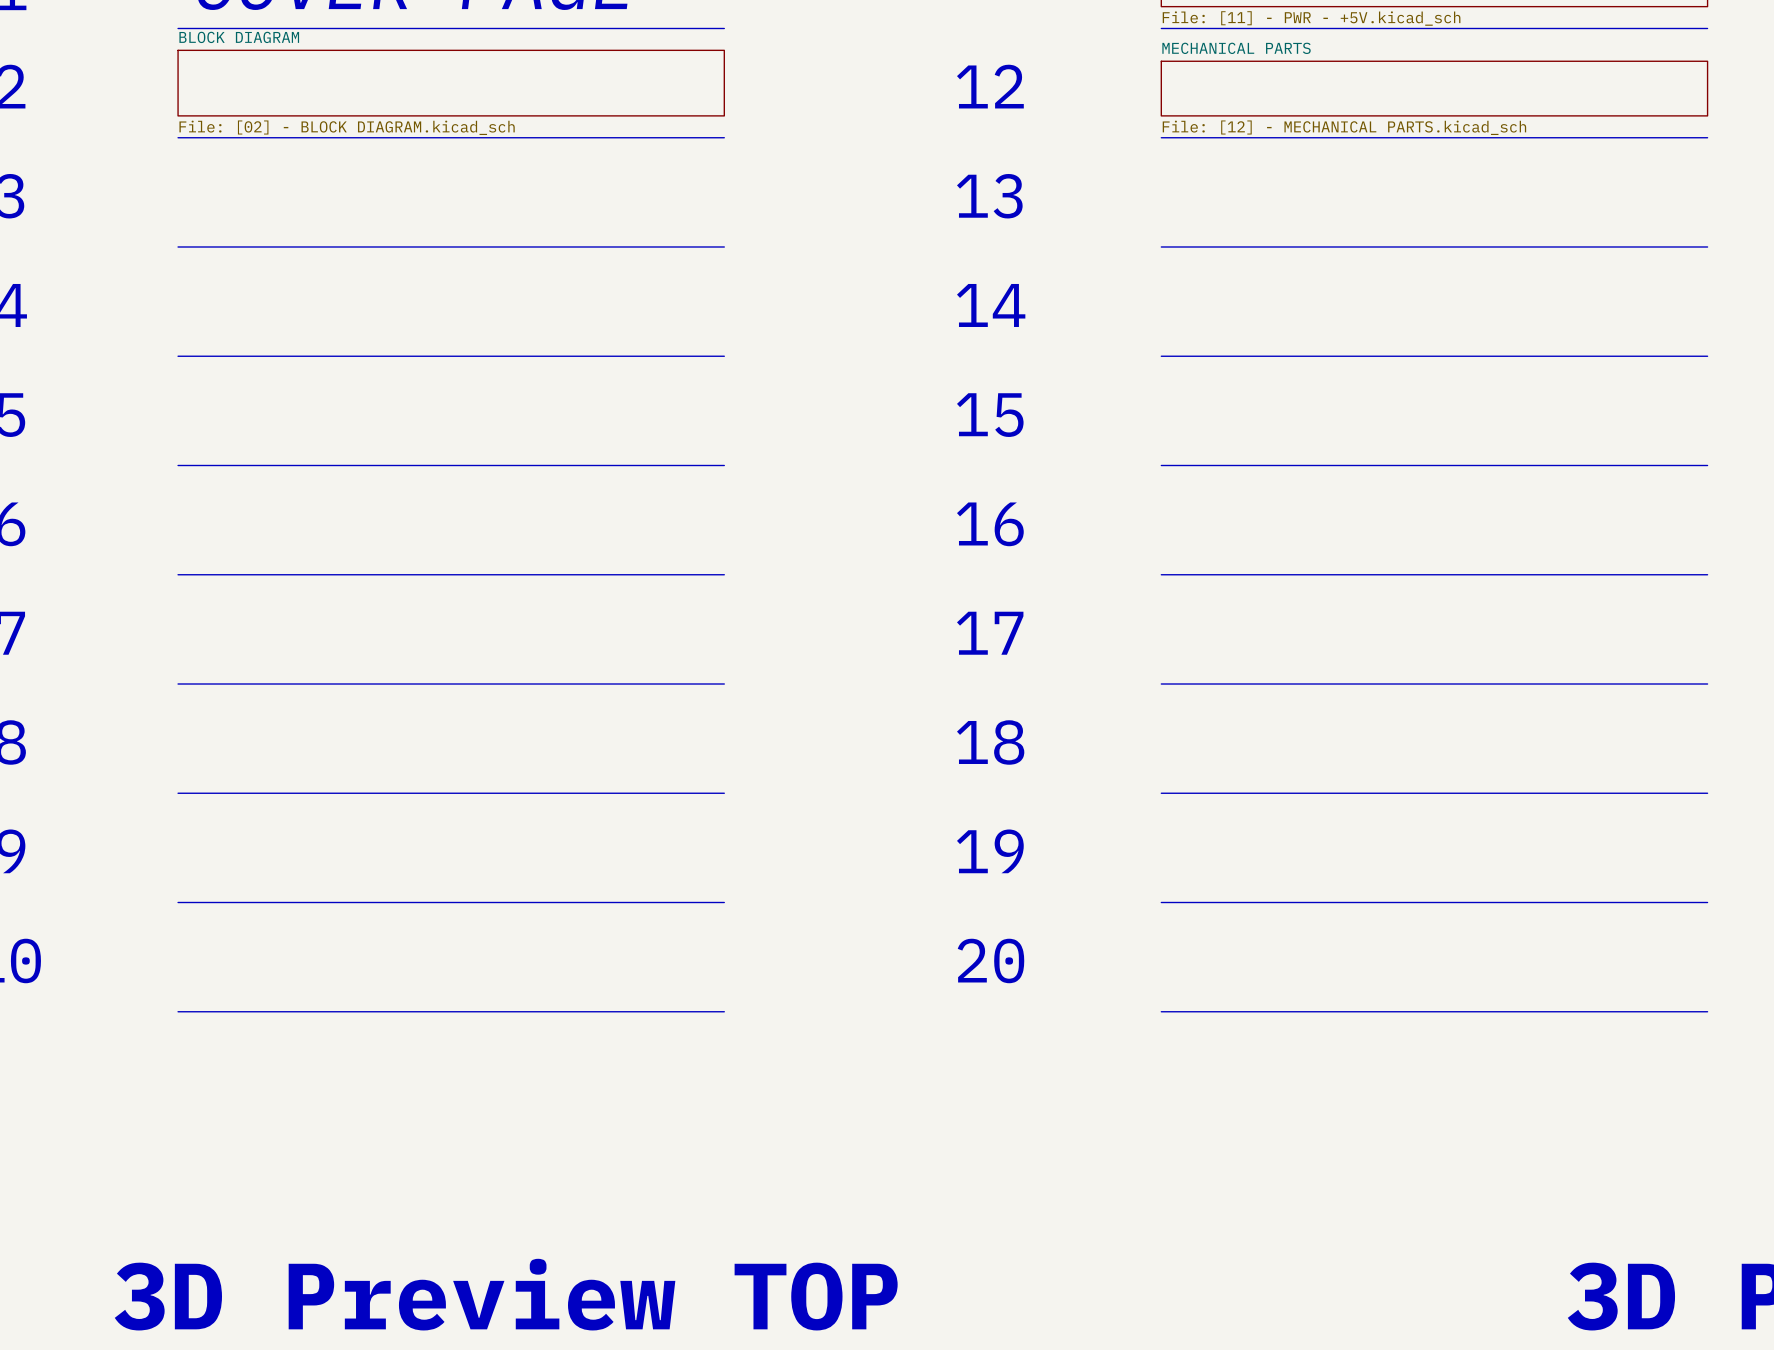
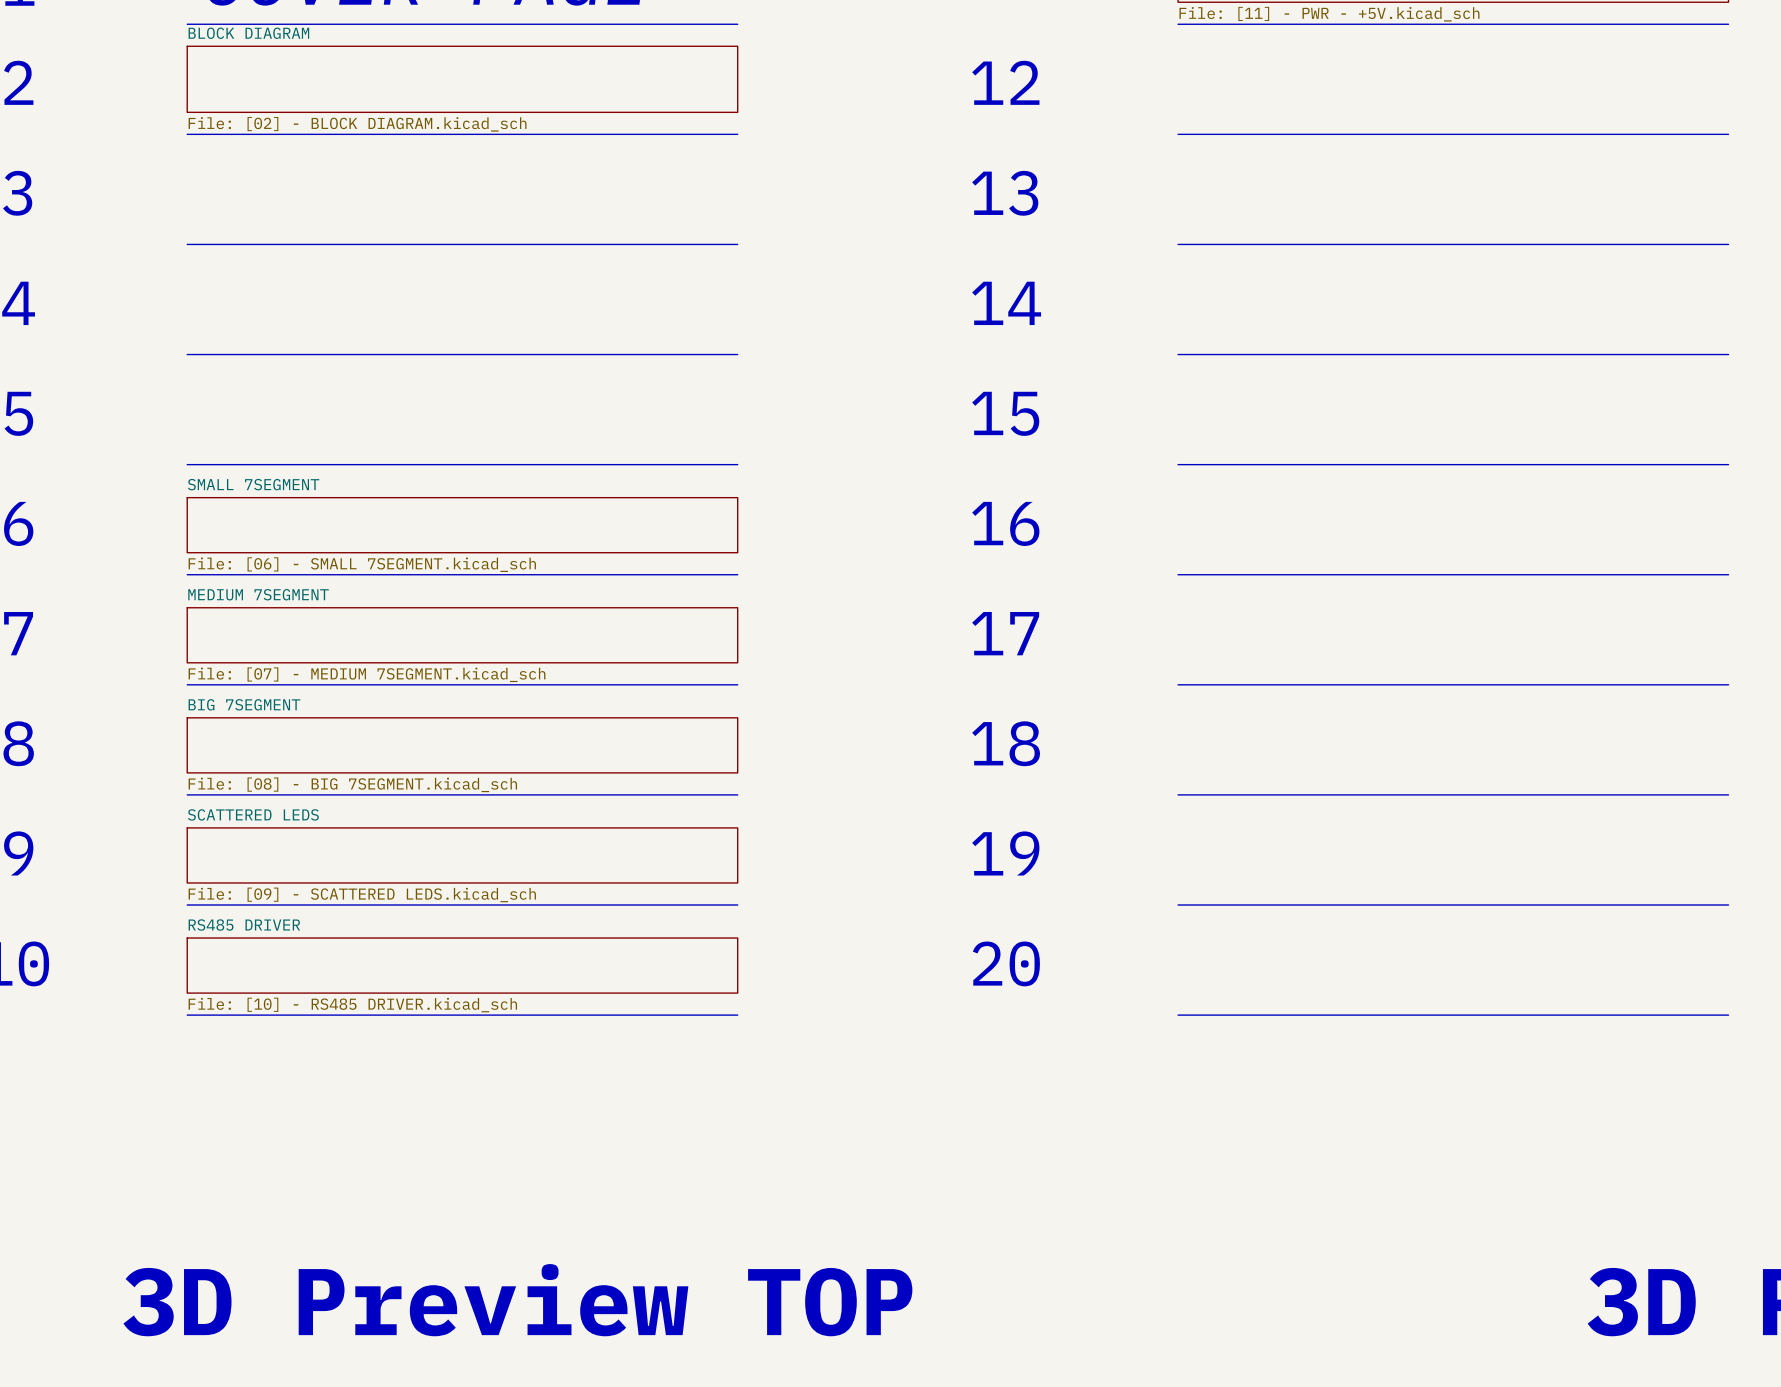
sheet MECHANICAL PARTS: File: [12] - MECHANICAL PARTS.kicad_sch (1434, 88) -> none
sheet SMALL 7SEGMENT: none -> File: [06] - SMALL 7SEGMENT.kicad_sch (462, 525)
sheet MEDIUM 7SEGMENT: none -> File: [07] - MEDIUM 7SEGMENT.kicad_sch (462, 635)
sheet BIG 7SEGMENT: none -> File: [08] - BIG 7SEGMENT.kicad_sch (462, 745)
sheet SCATTERED LEDS: none -> File: [09] - SCATTERED LEDS.kicad_sch (462, 855)
sheet RS485 DRIVER: none -> File: [10] - RS485 DRIVER.kicad_sch (462, 965)

